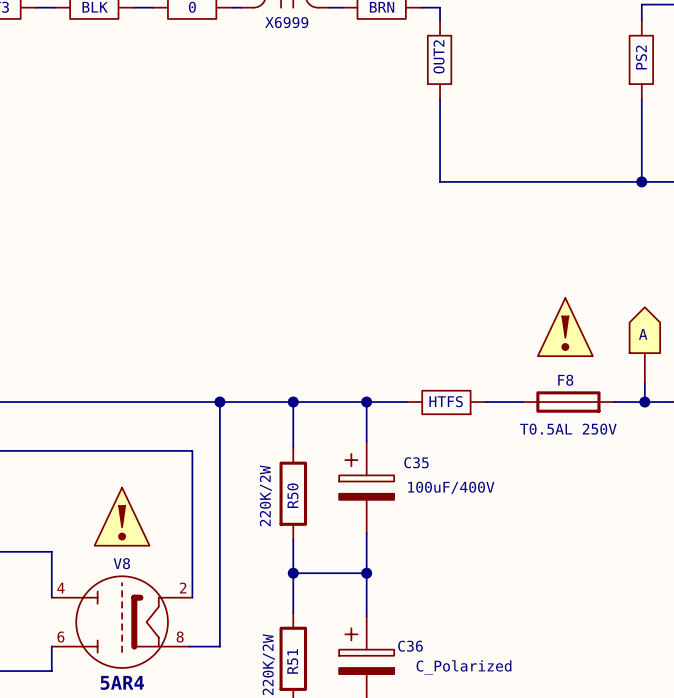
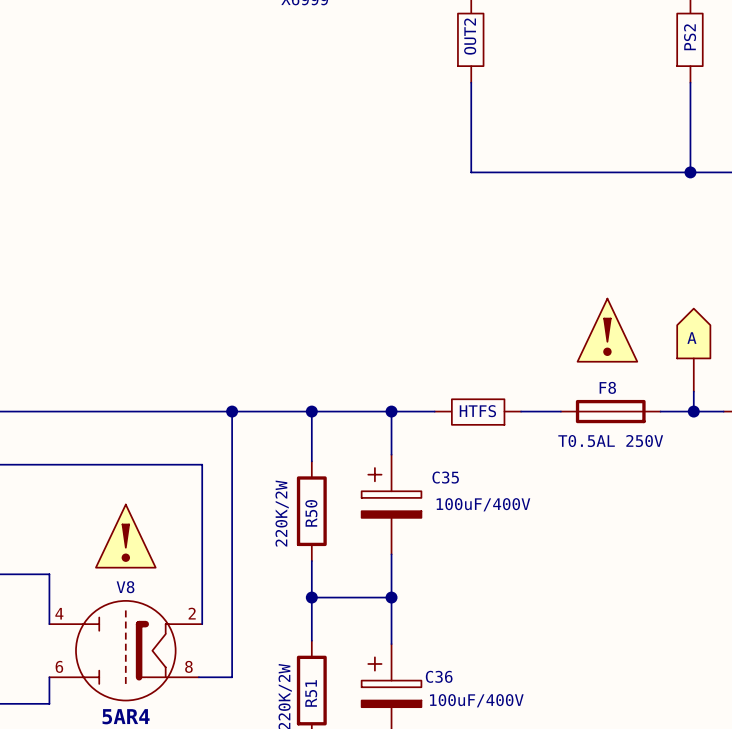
C36 value: C_Polarized (463, 667) -> 100uF/400V (476, 700)

